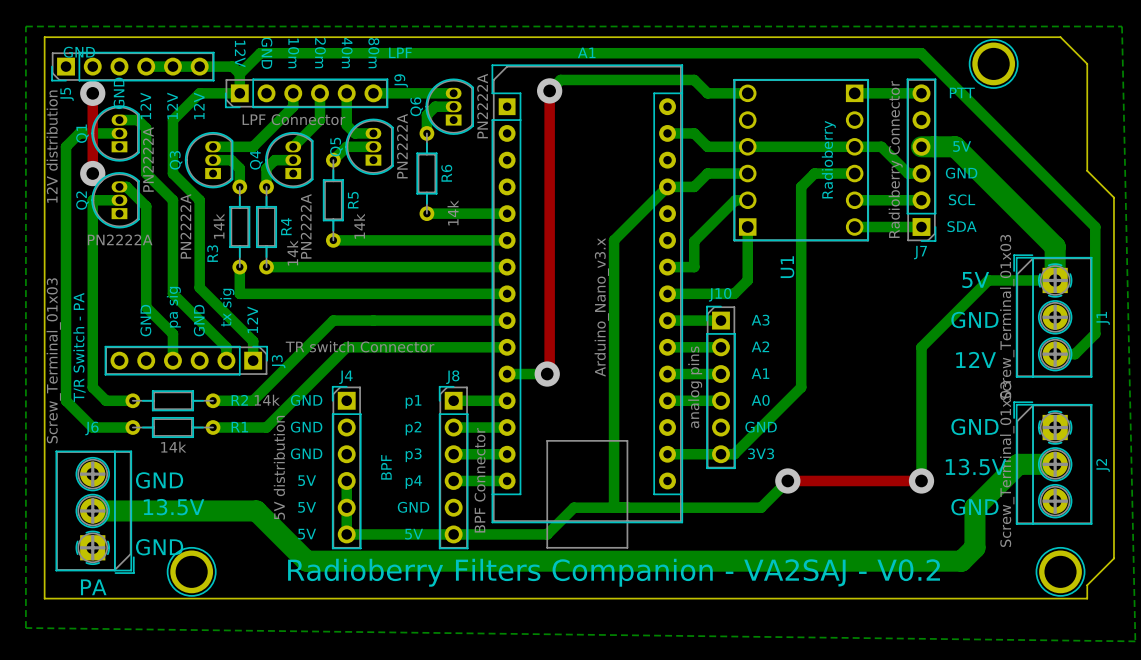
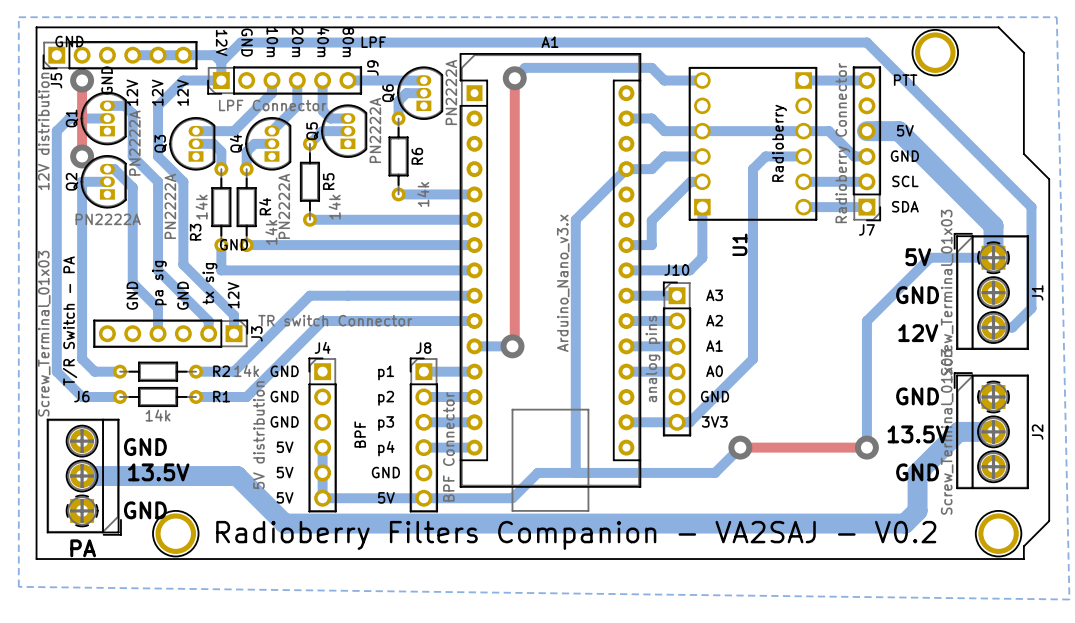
text: none -> GND (234, 244)

